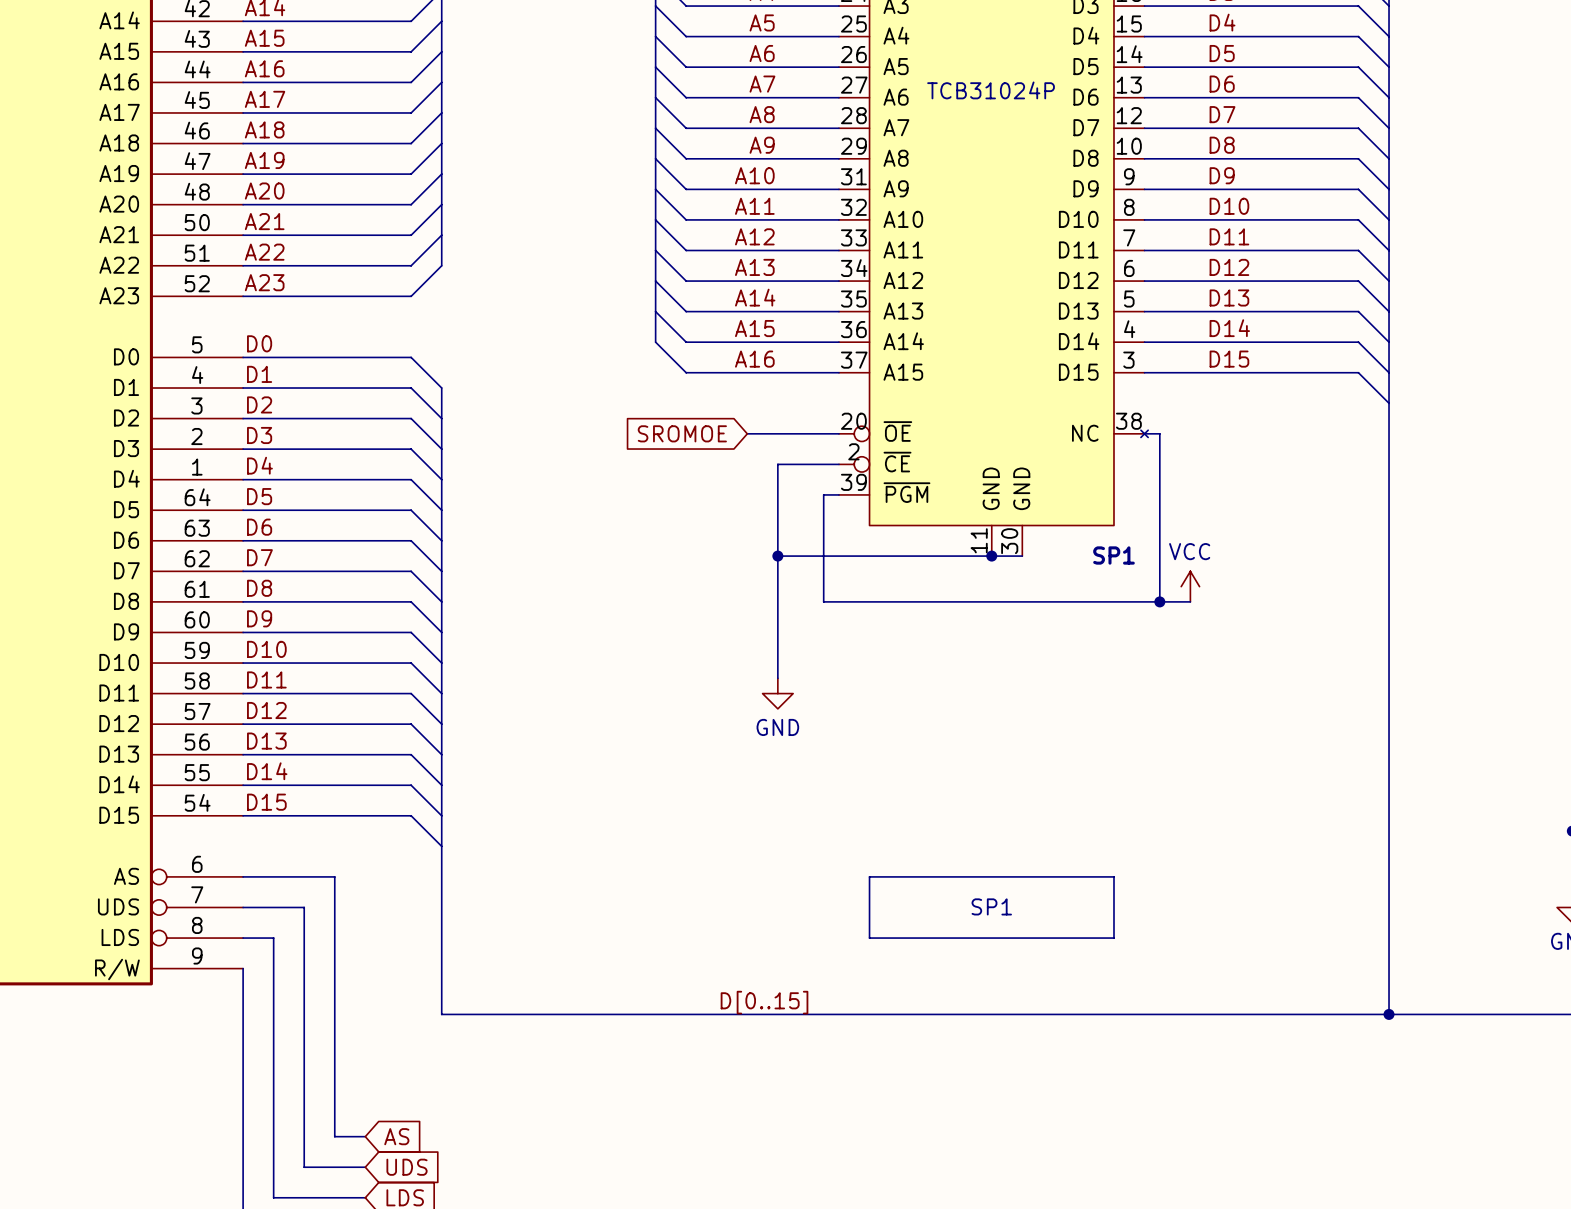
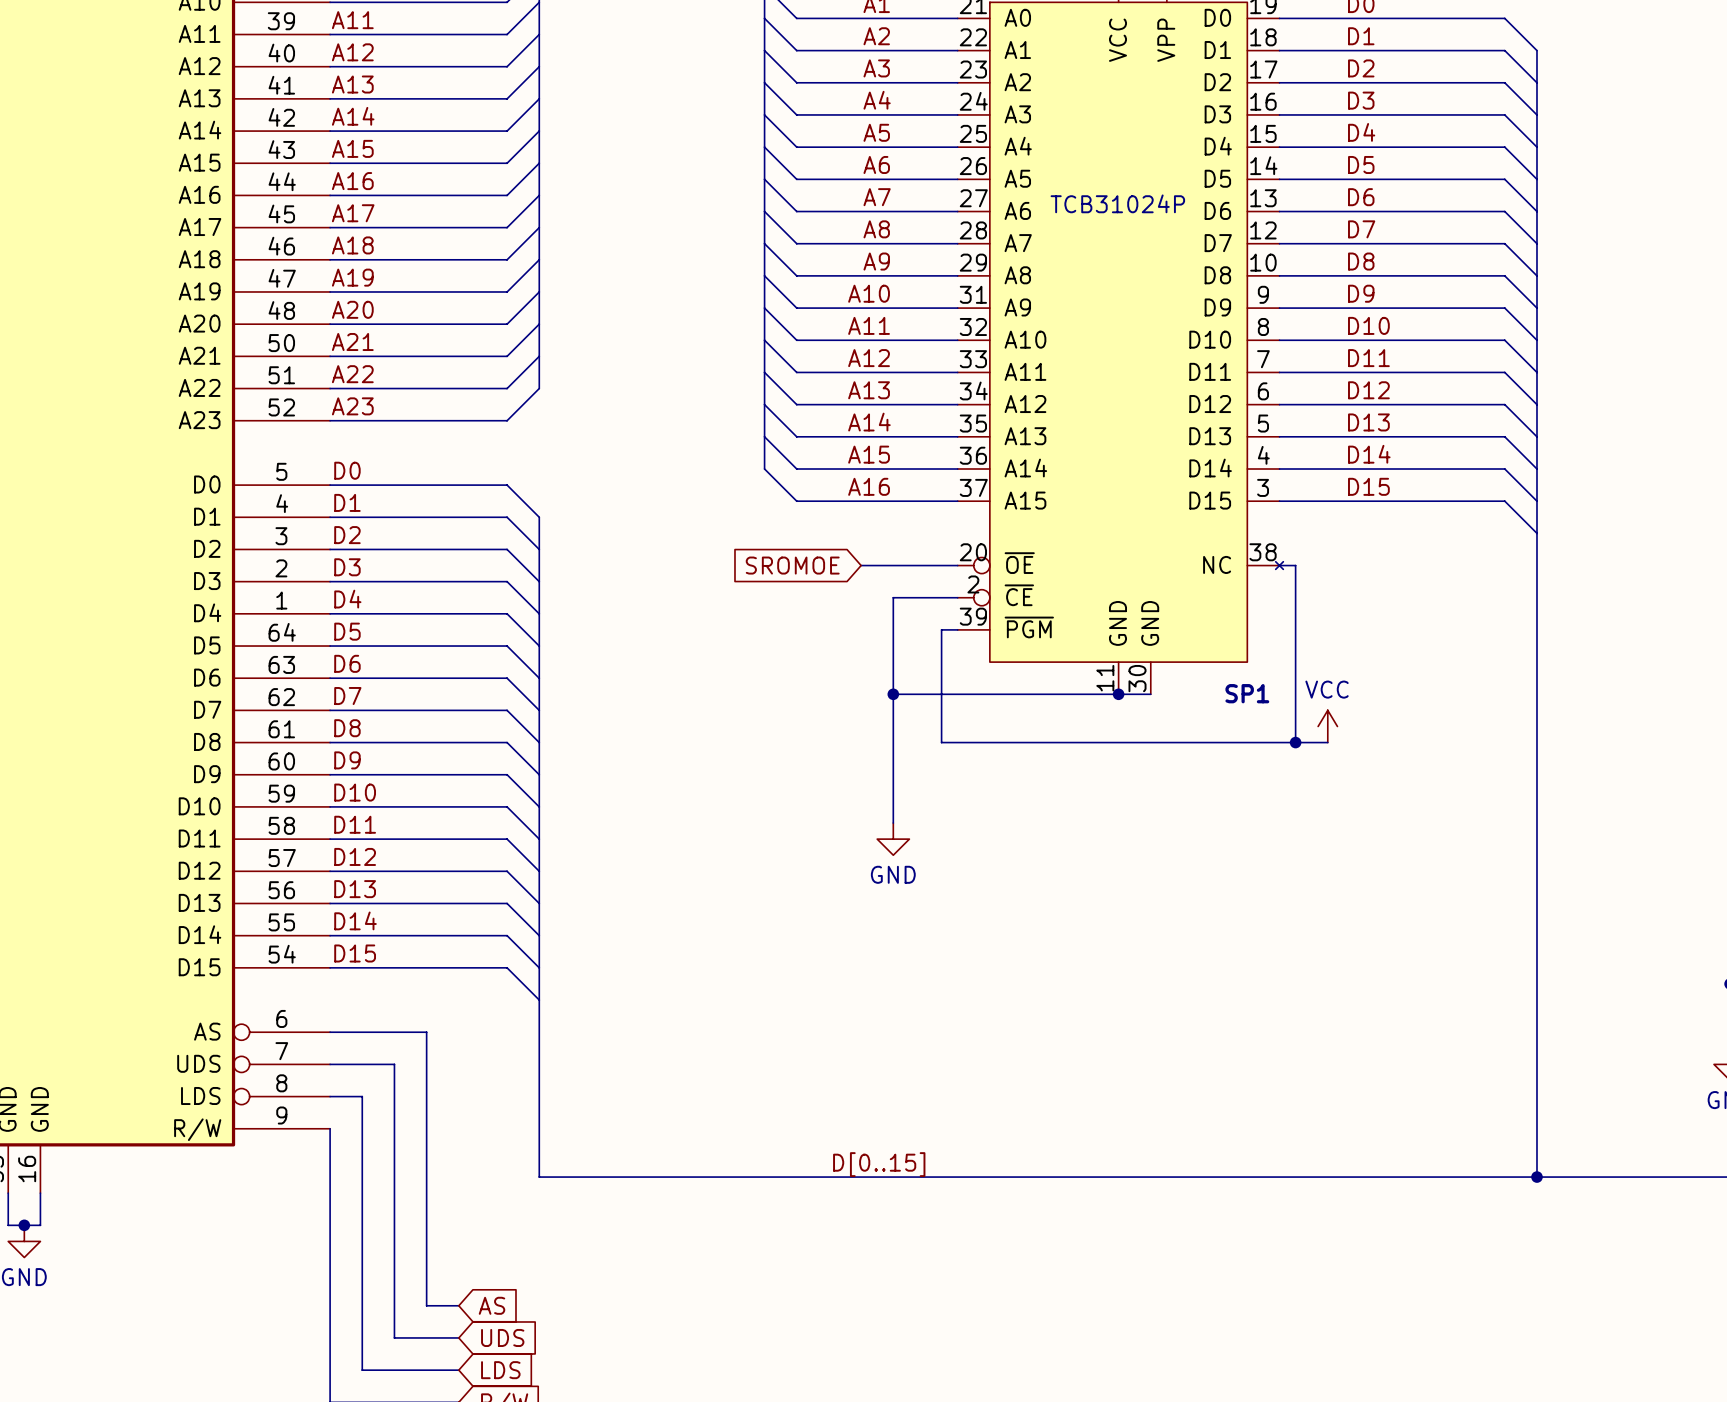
line: (869, 876) (1113, 876) (1113, 938) (869, 938) (869, 876) -> none
text: SP1 (991, 906) -> none

